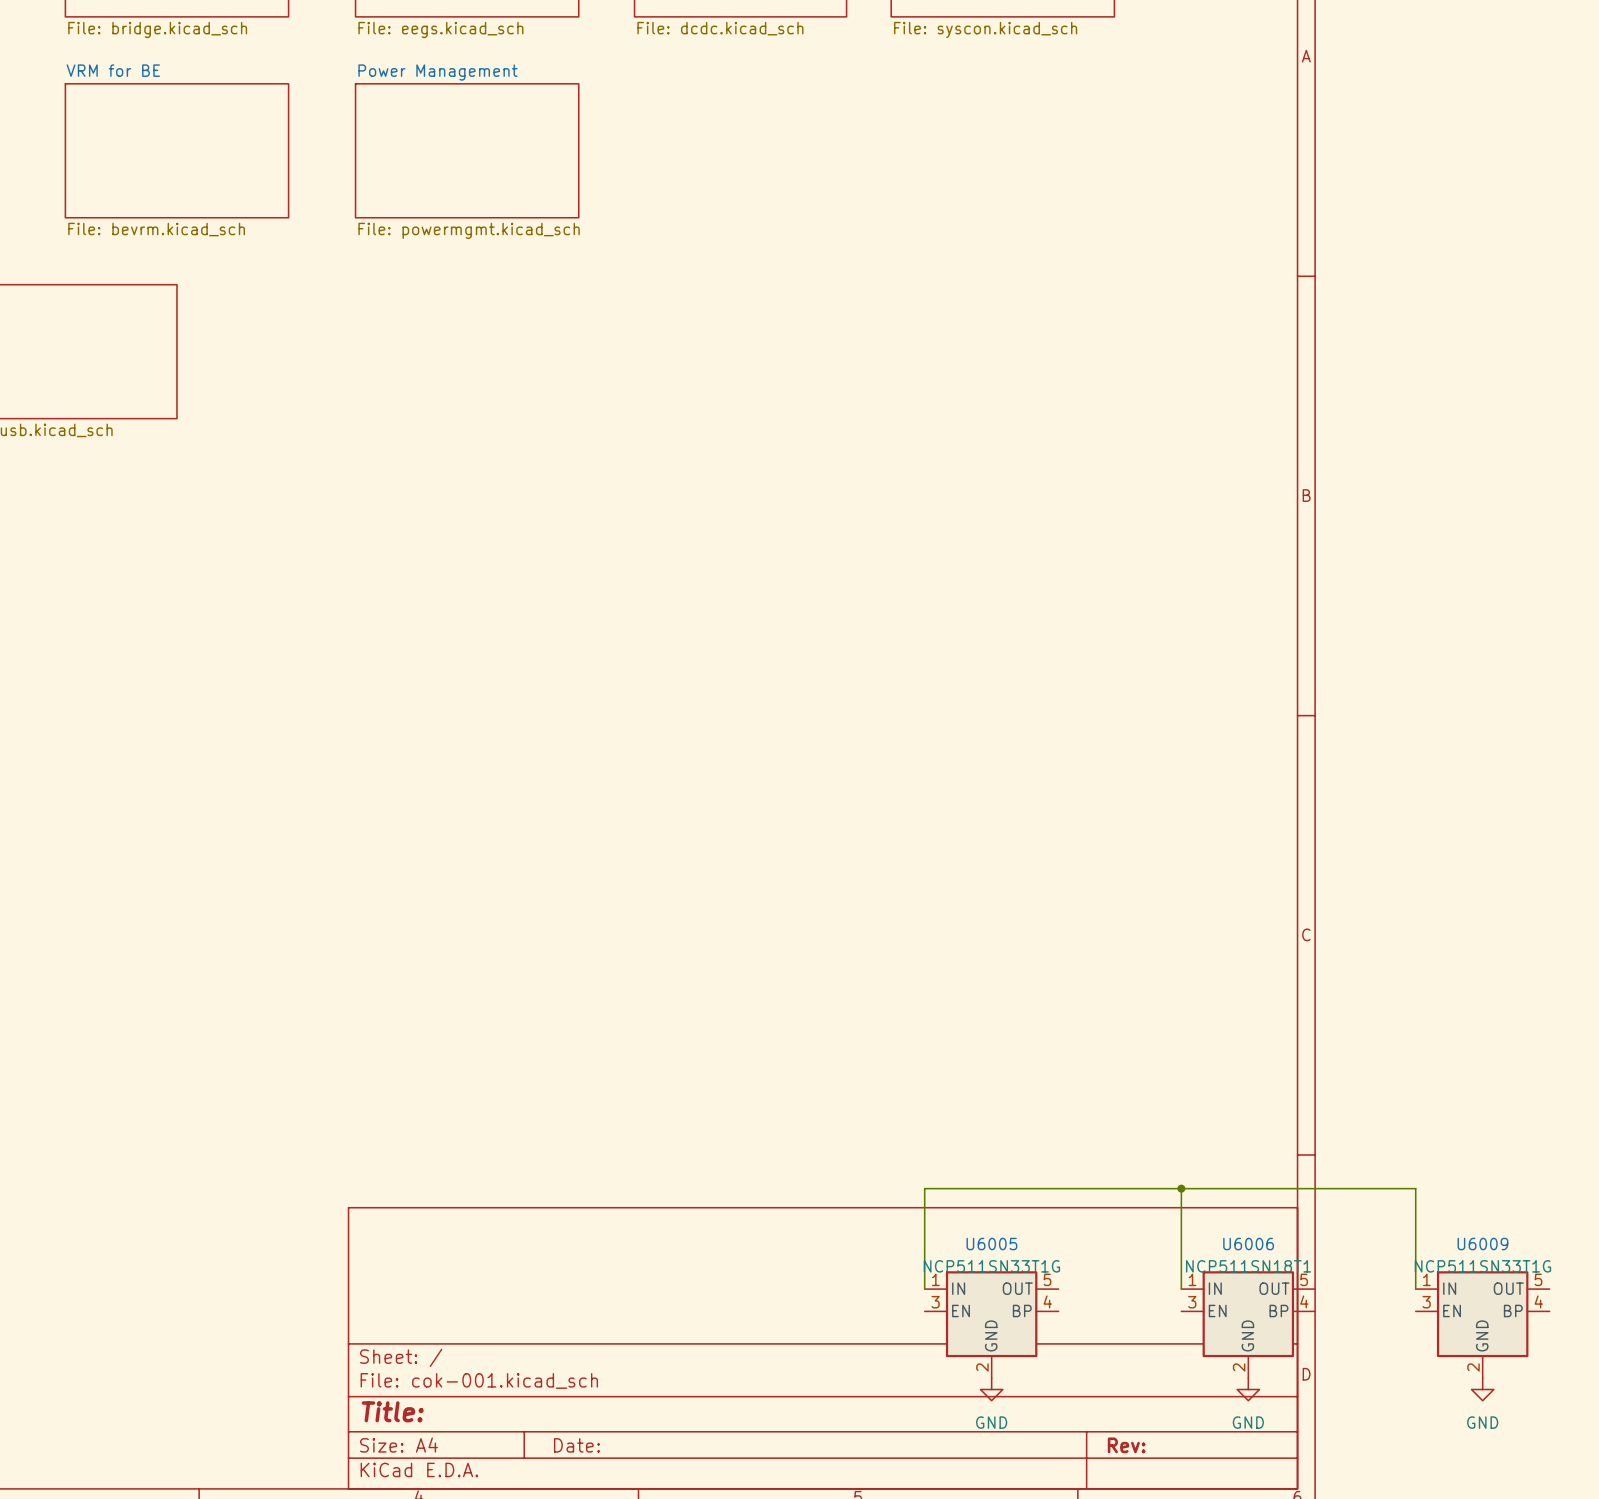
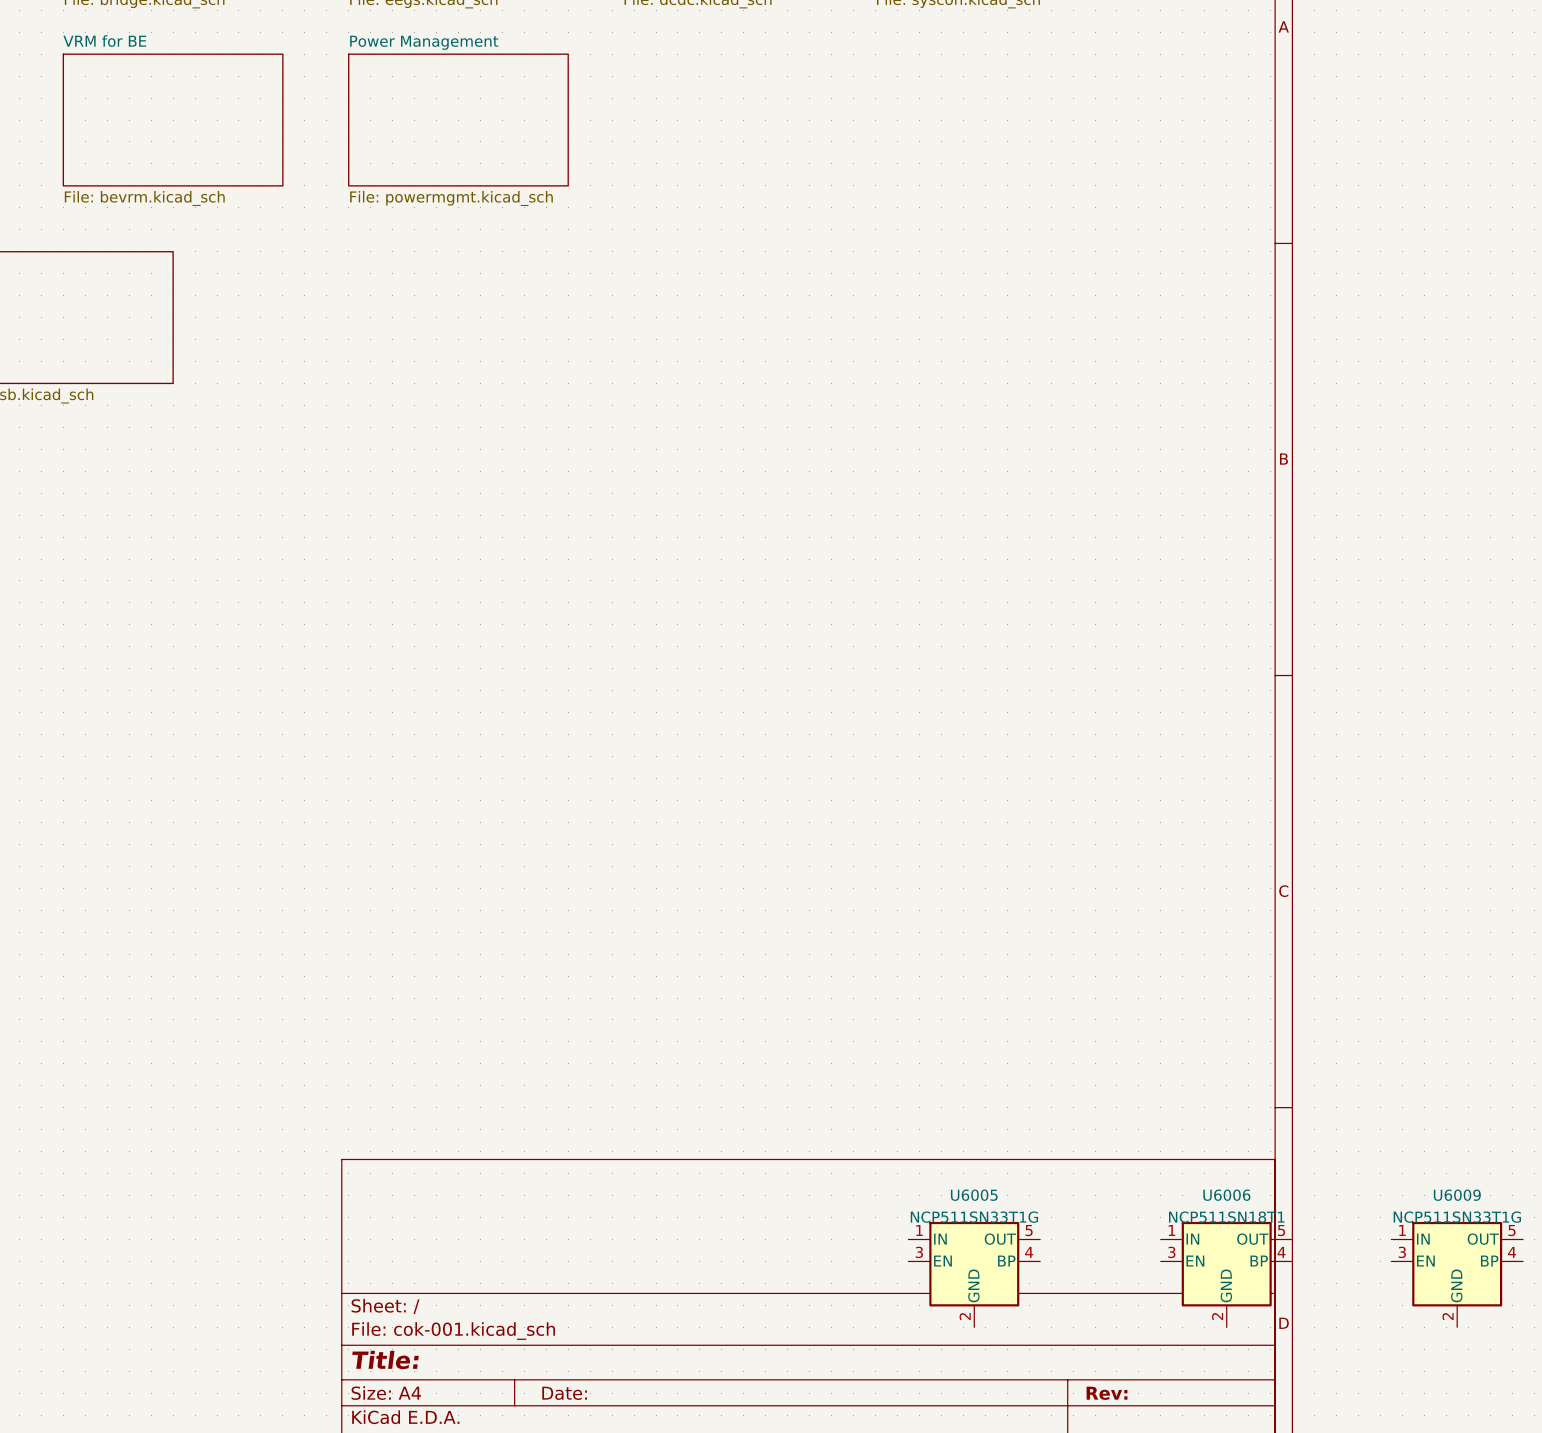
wire: (1181, 1188) (1181, 1289) -> none
junction: (1181, 1188) -> none
wire: (924, 1289) (924, 1188) (1415, 1188) (1415, 1289) -> none
power symbol: GND (991, 1389) -> none
power symbol: GND (1248, 1389) -> none
power symbol: GND (1482, 1389) -> none

